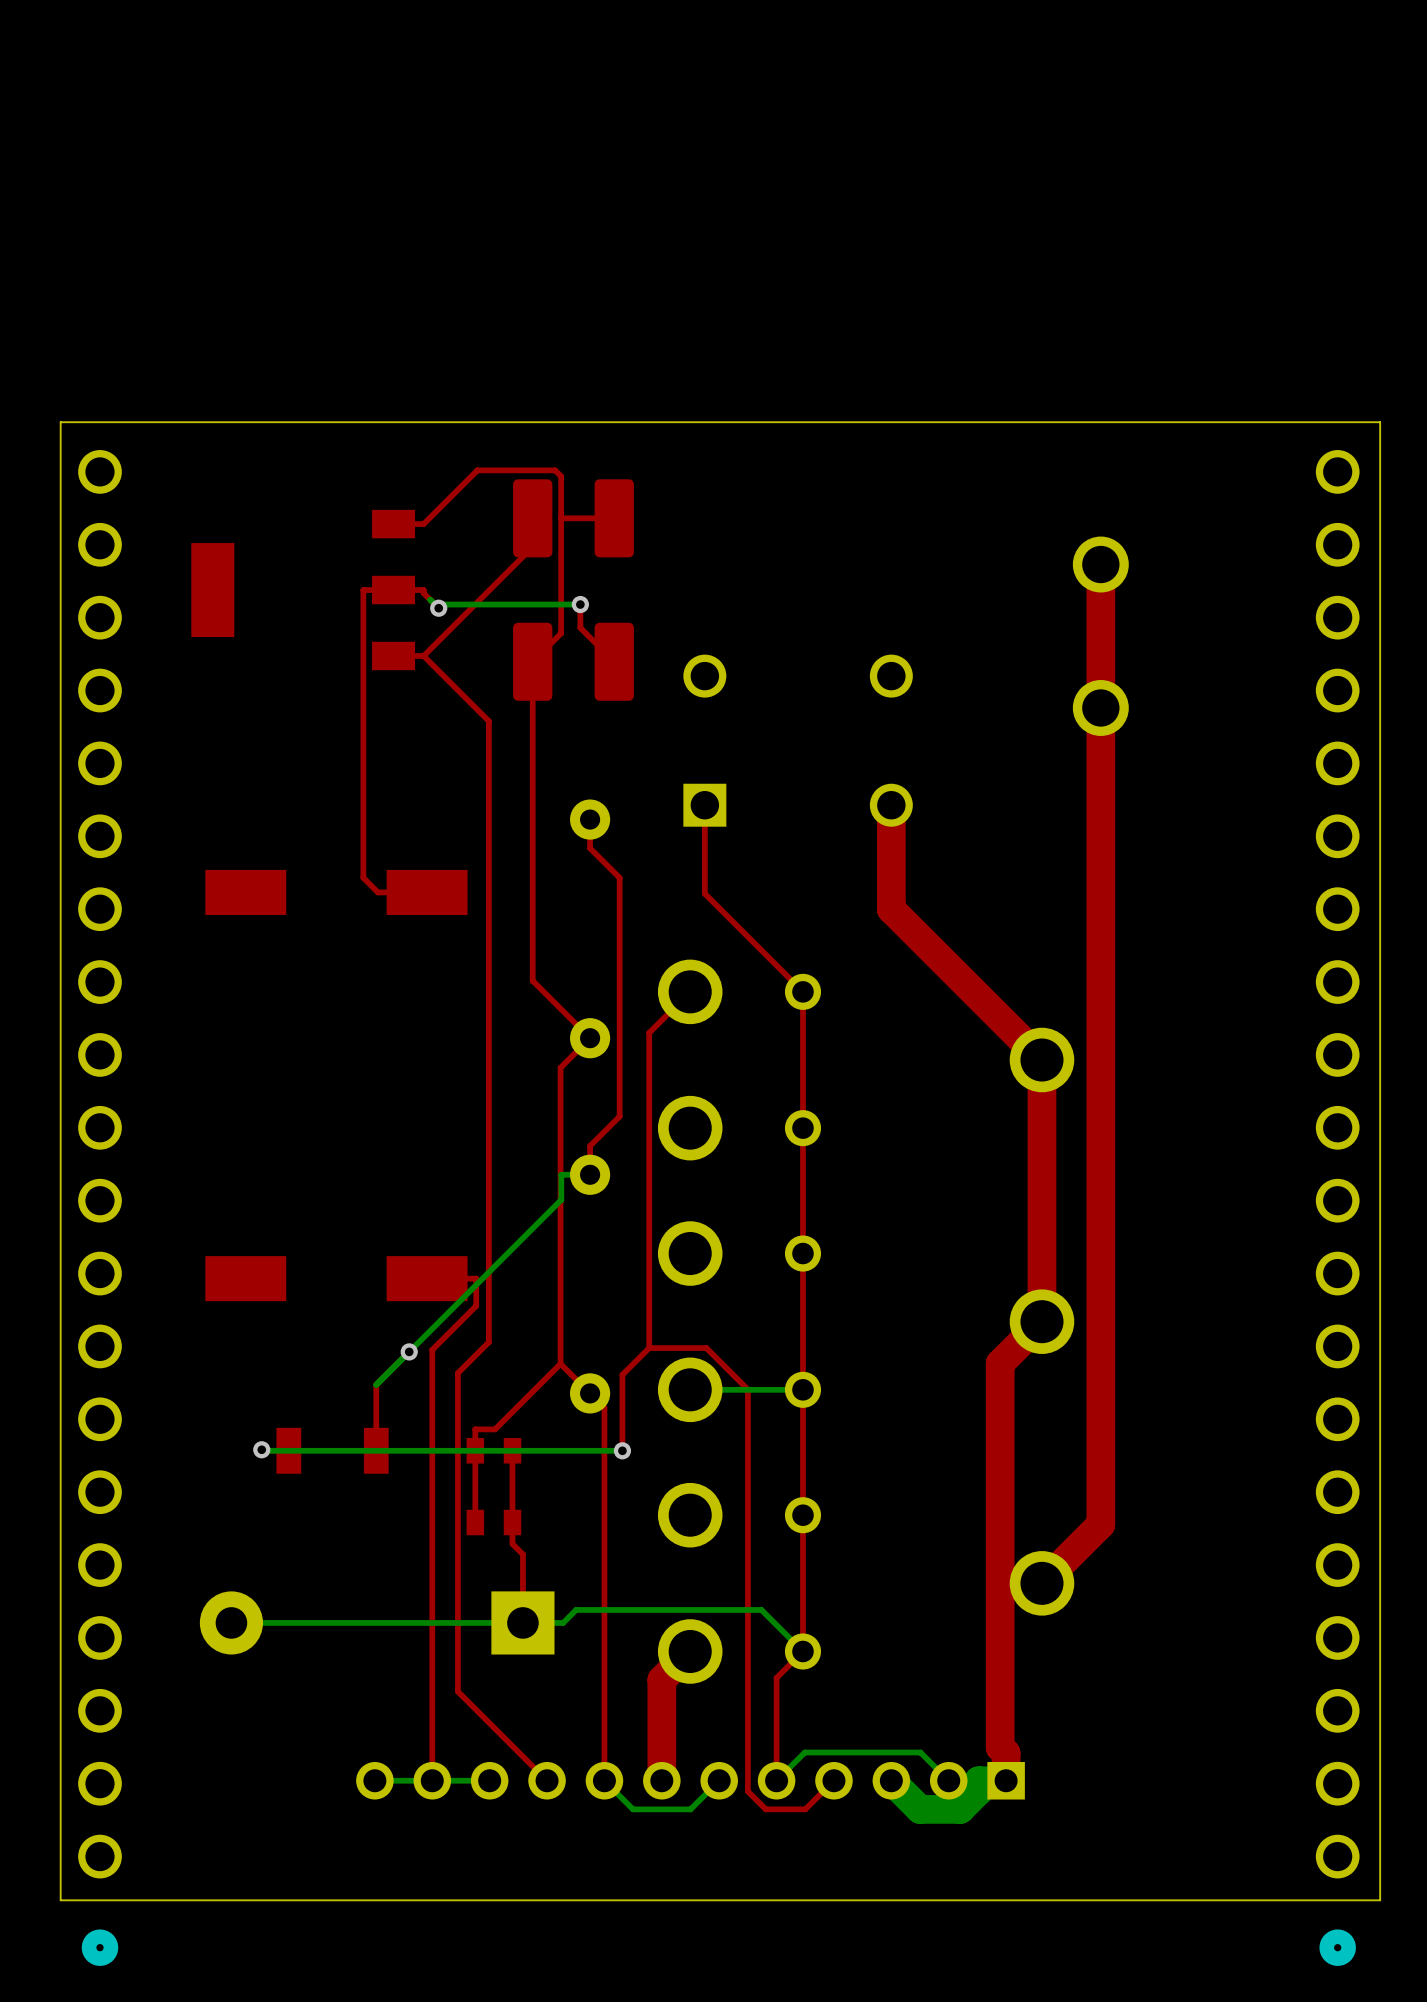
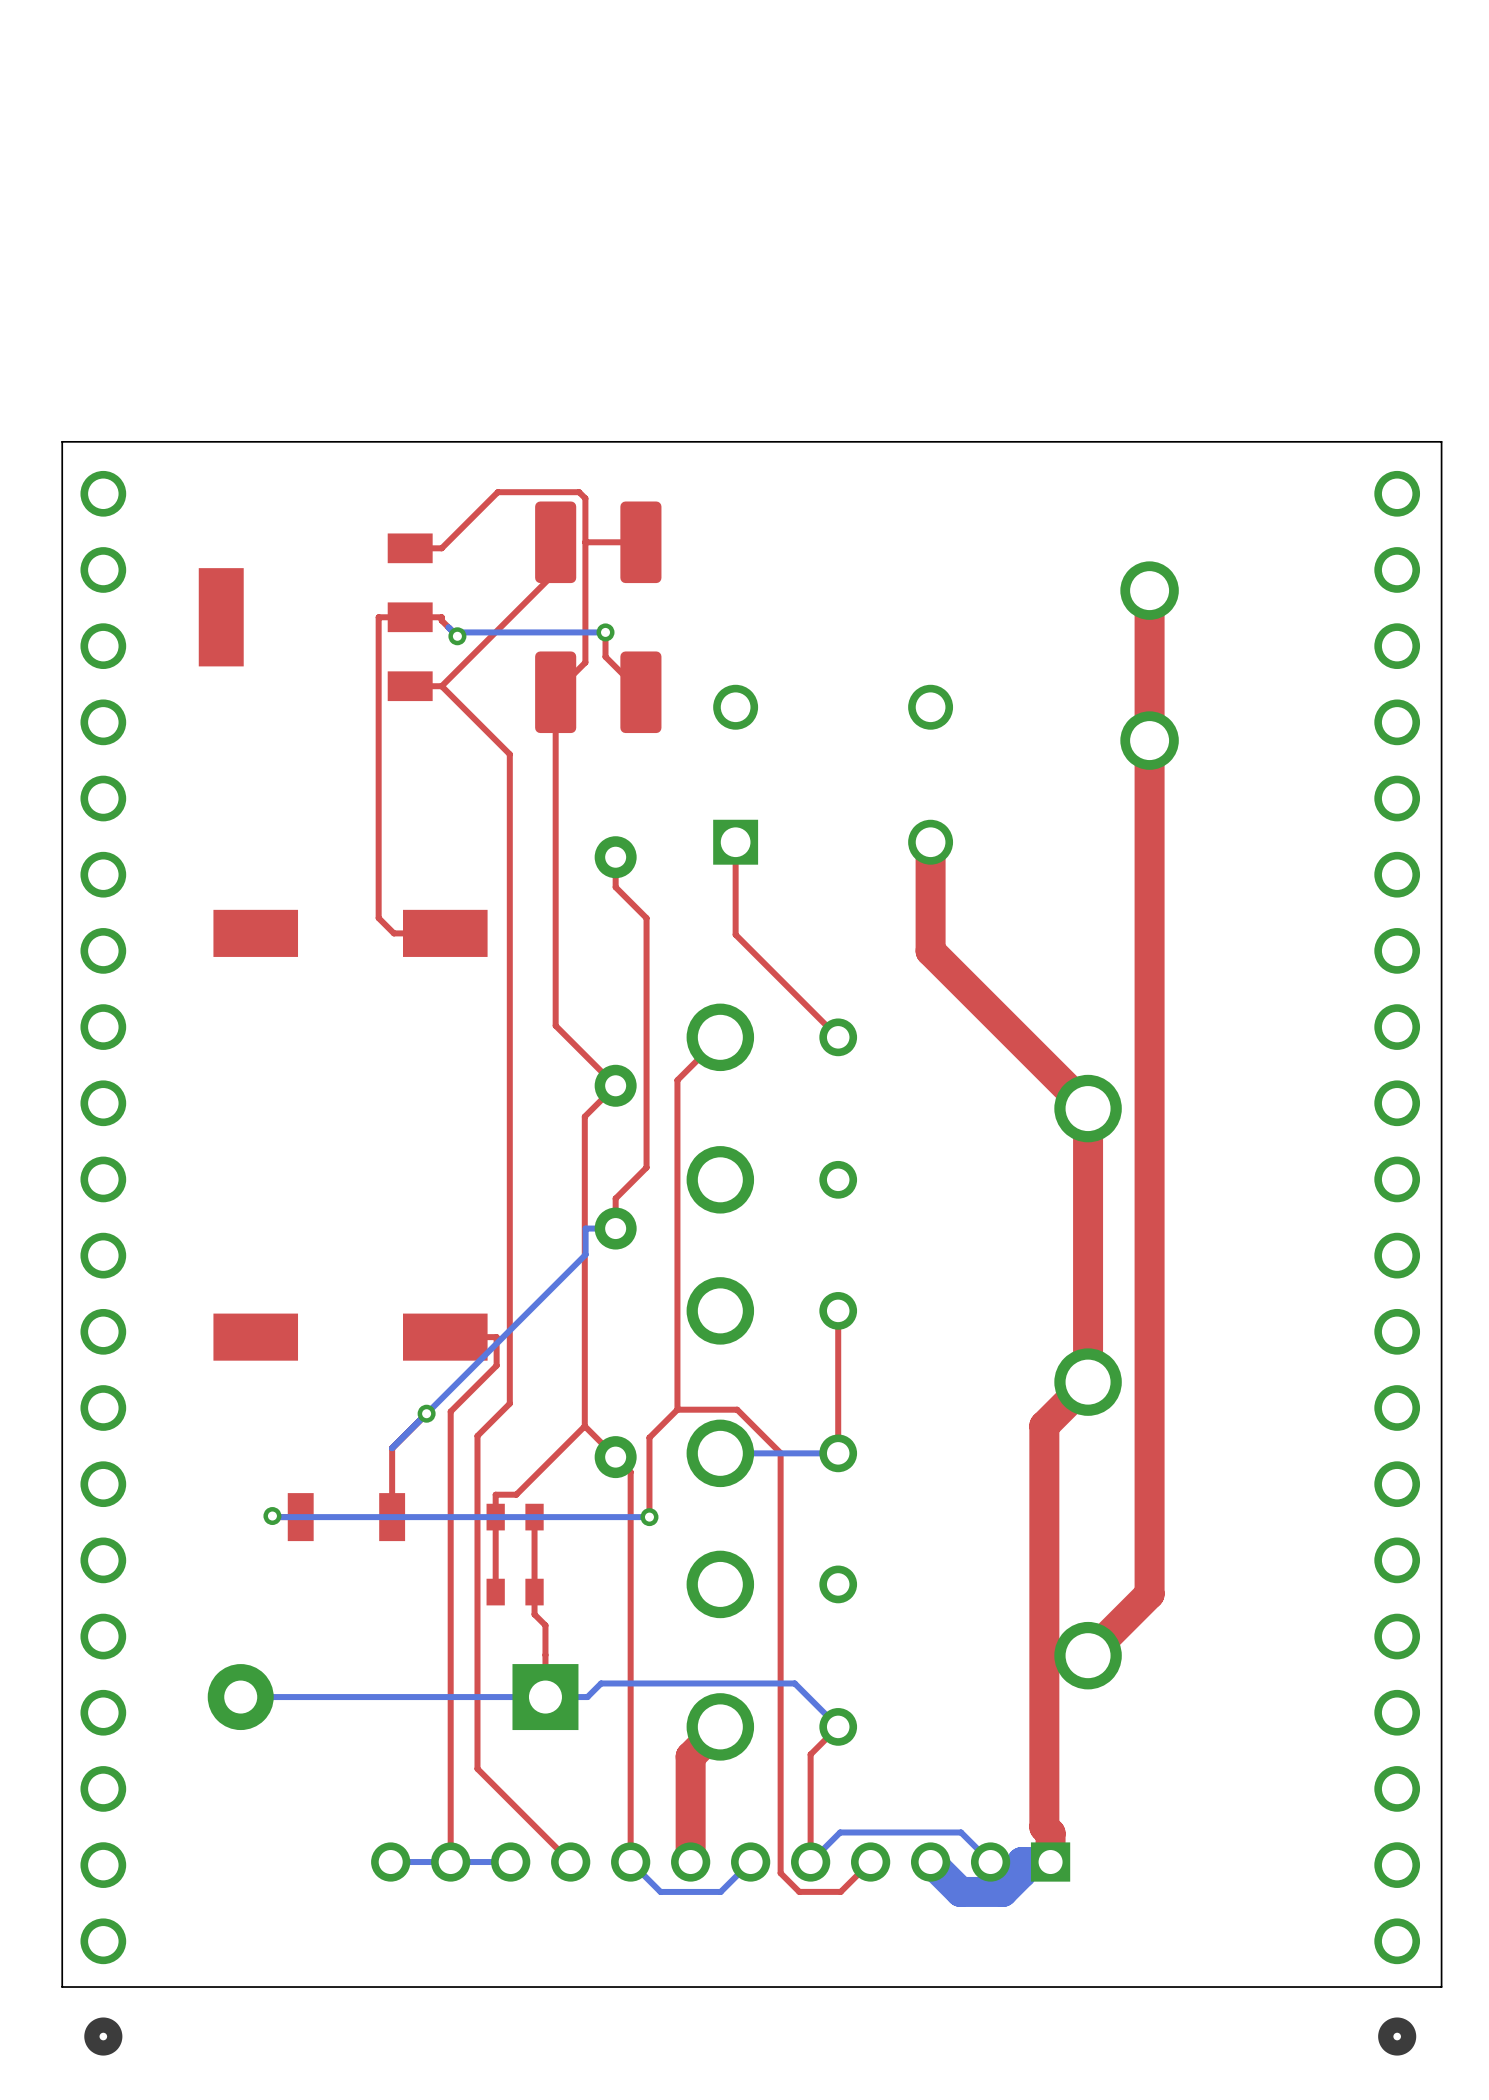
top track: (802, 991) (802, 1253) -> none
top track: (802, 1389) (802, 1651) -> none

